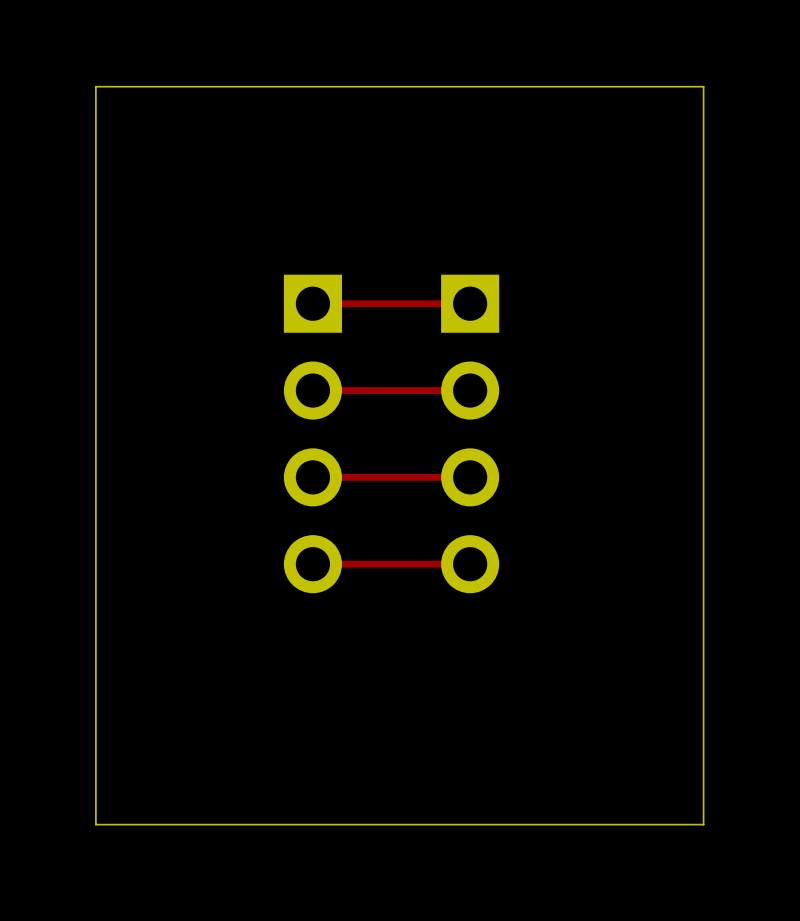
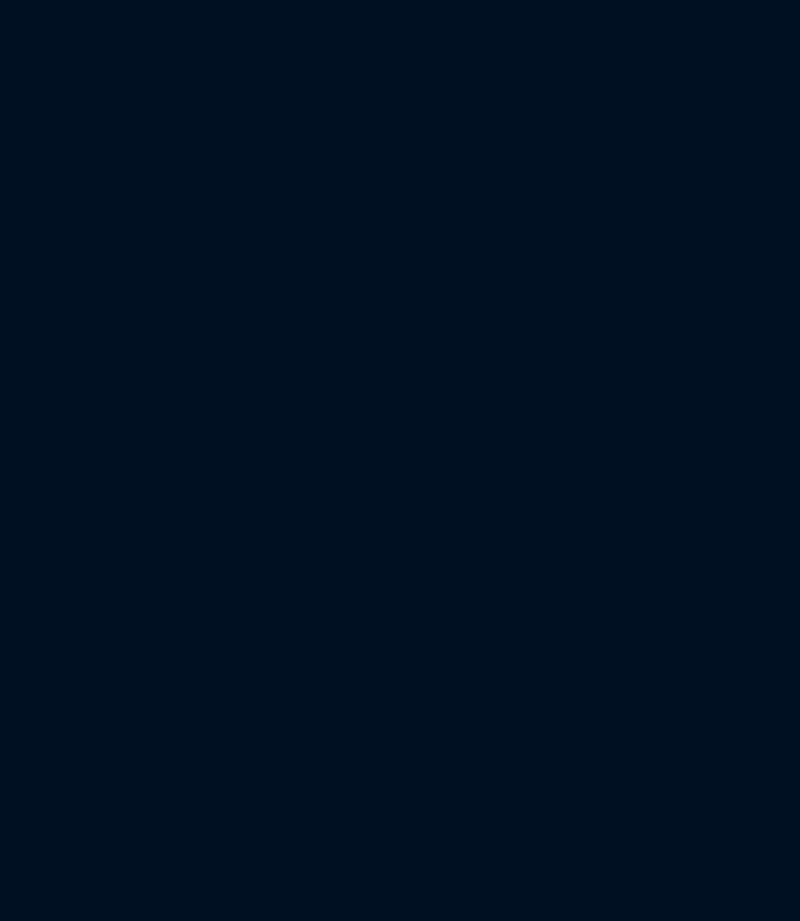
board edge: (703, 86) (95, 86) (95, 824) (703, 824) (703, 86) -> none
top track: (470, 303) (312, 303) -> none
top track: (470, 390) (312, 390) -> none
part: (312, 433) -> none
part: (470, 433) -> none
top track: (470, 477) (312, 477) -> none
top track: (470, 564) (312, 564) -> none

